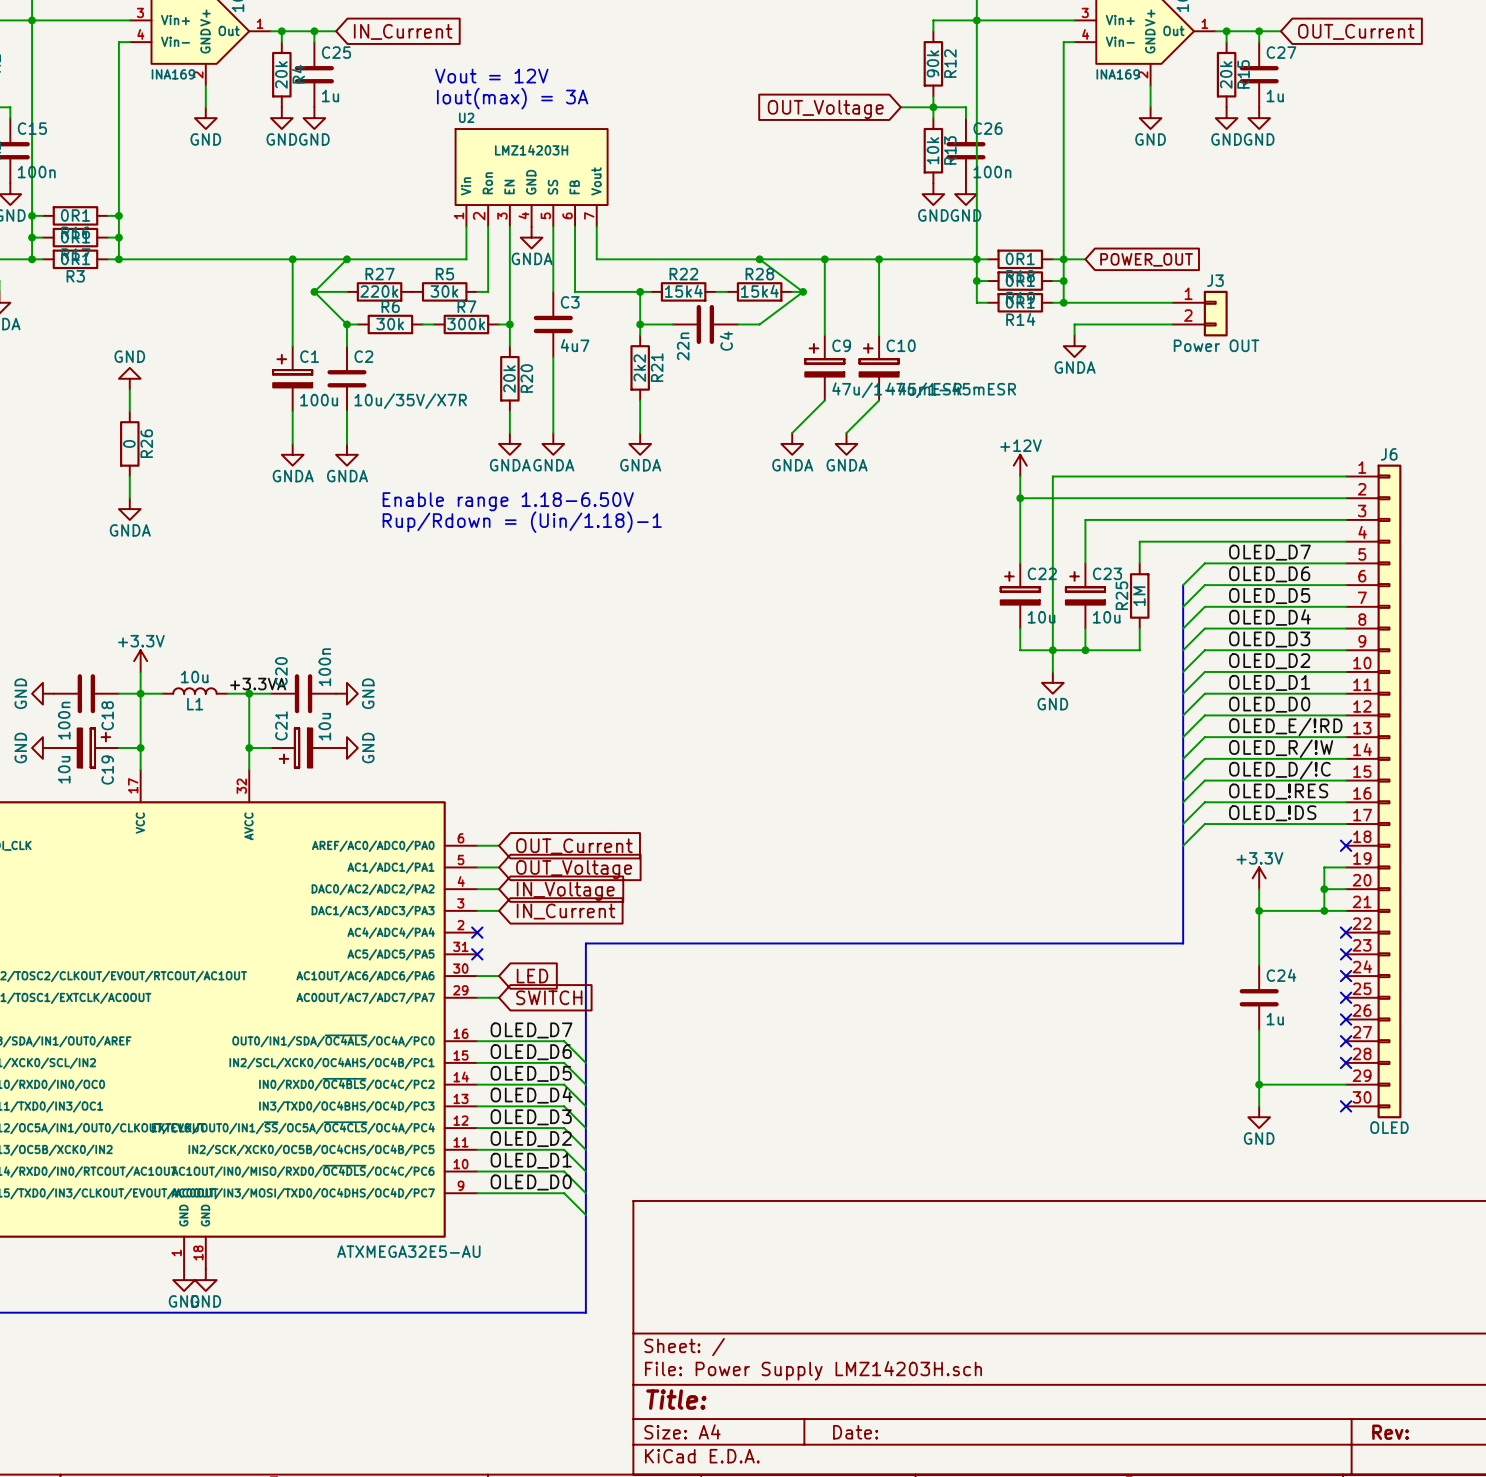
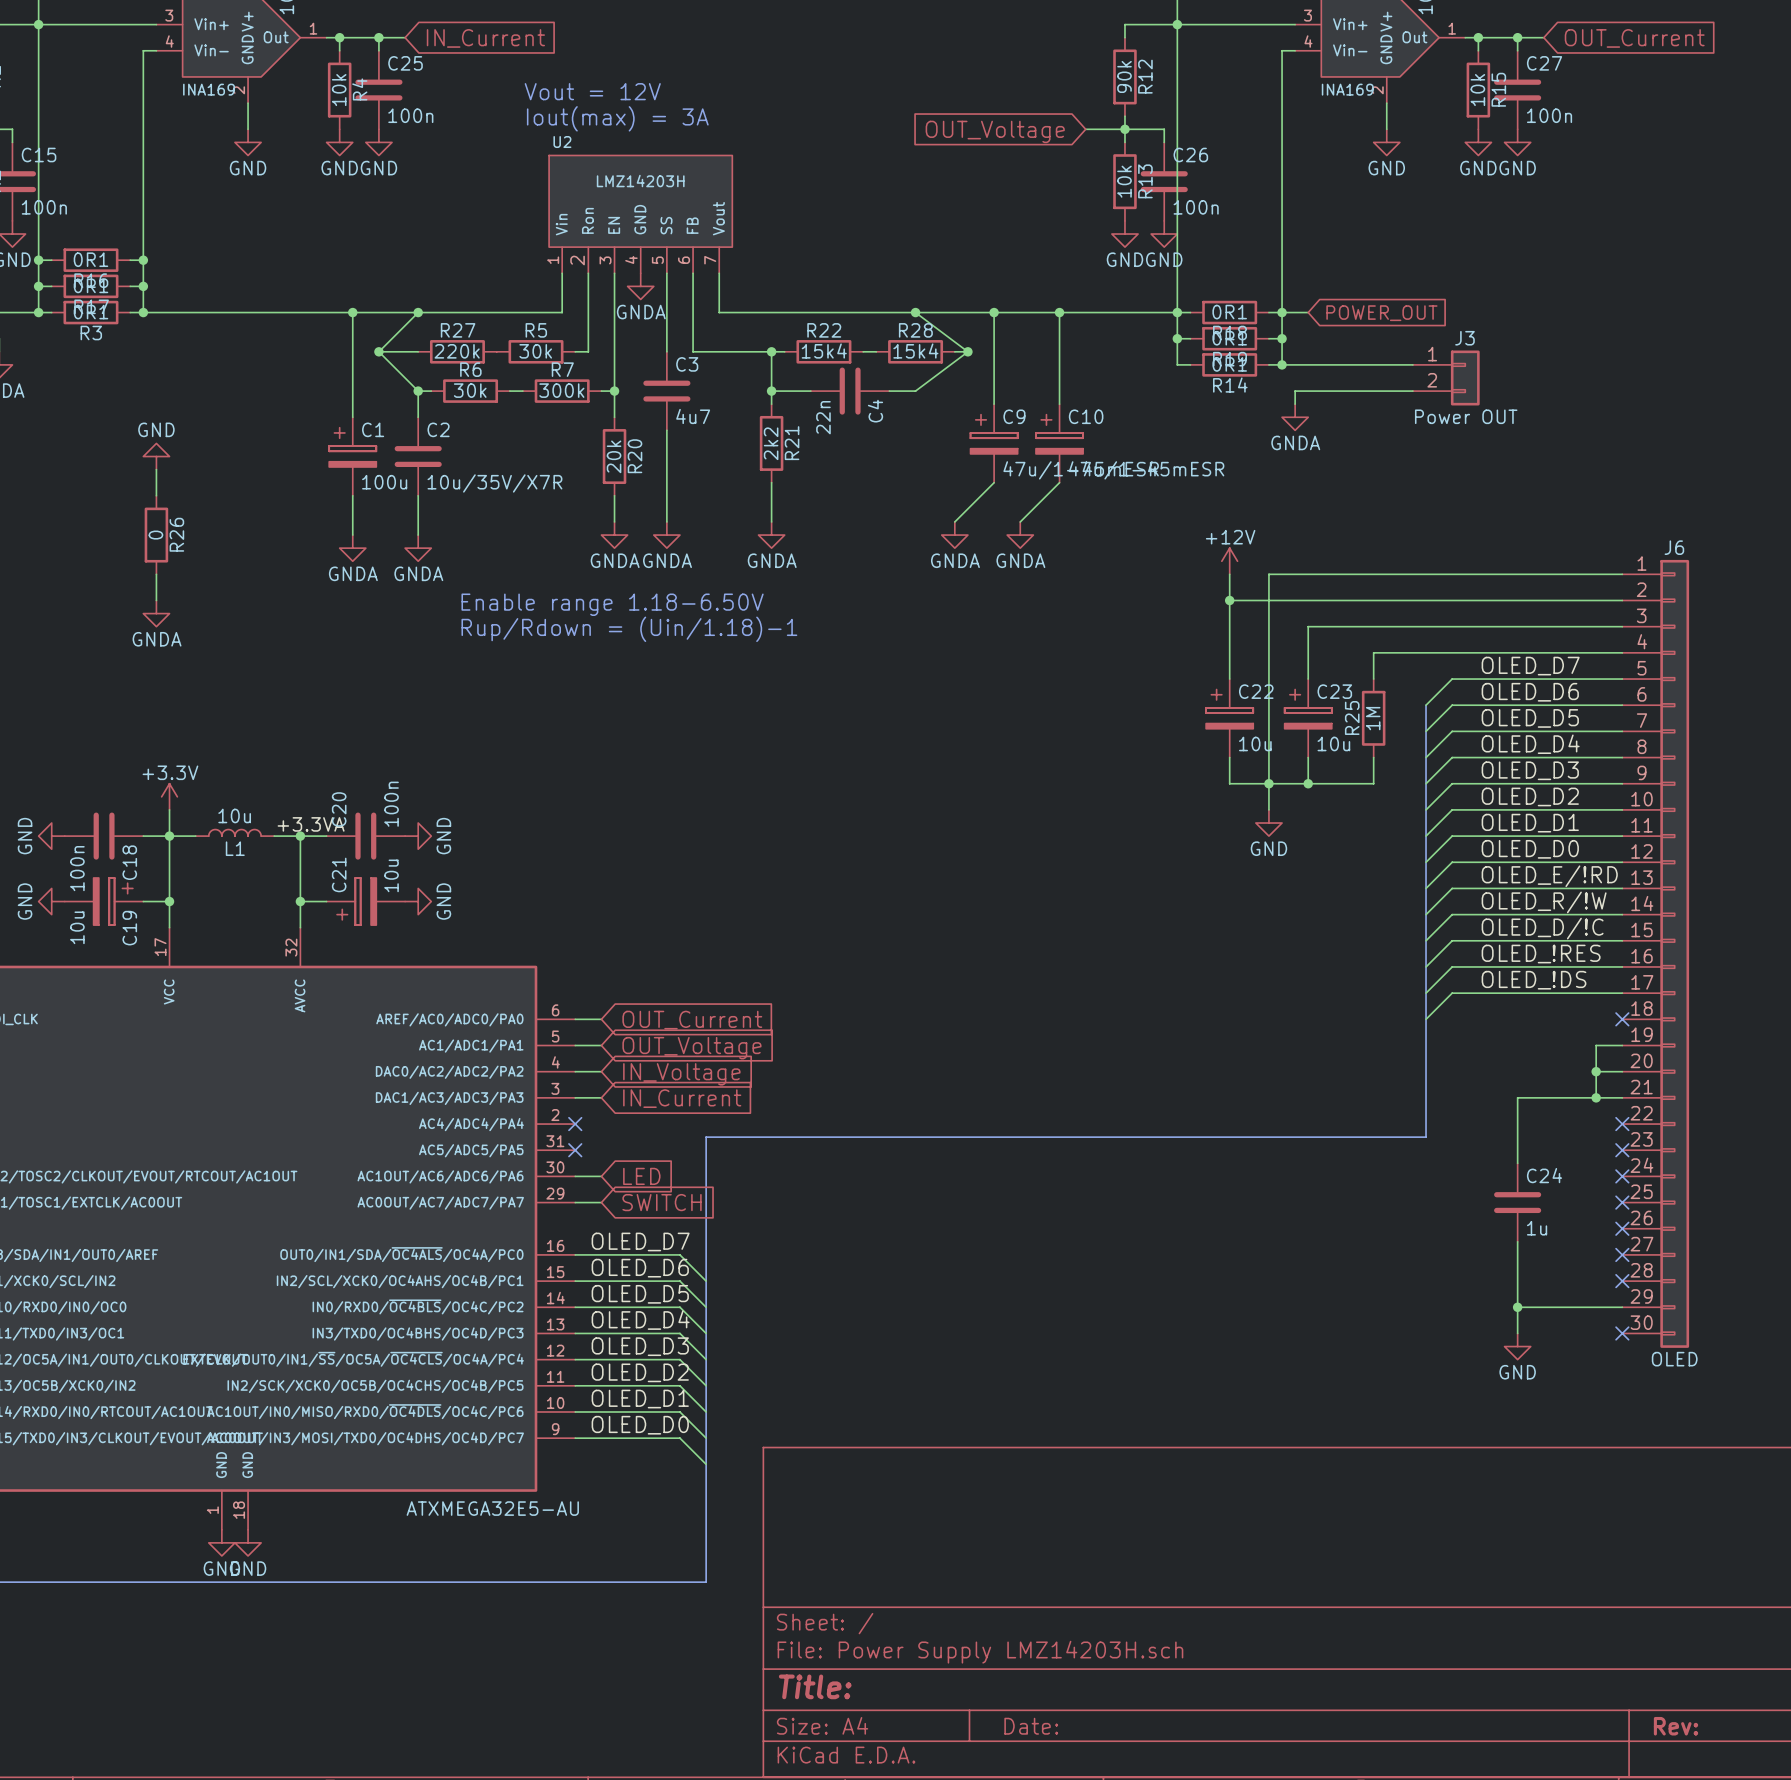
R4 value: 20k (281, 74) -> 10k (339, 90)
R15 value: 20k (1226, 74) -> 10k (1477, 90)
C25 value: 1u (330, 96) -> 100n (410, 115)
C27 value: 1u (1275, 96) -> 100n (1549, 115)
power symbol: +3.3V (1259, 878) -> none
wire: (1259, 889) (1259, 910) -> none
junction: (1259, 910) -> none

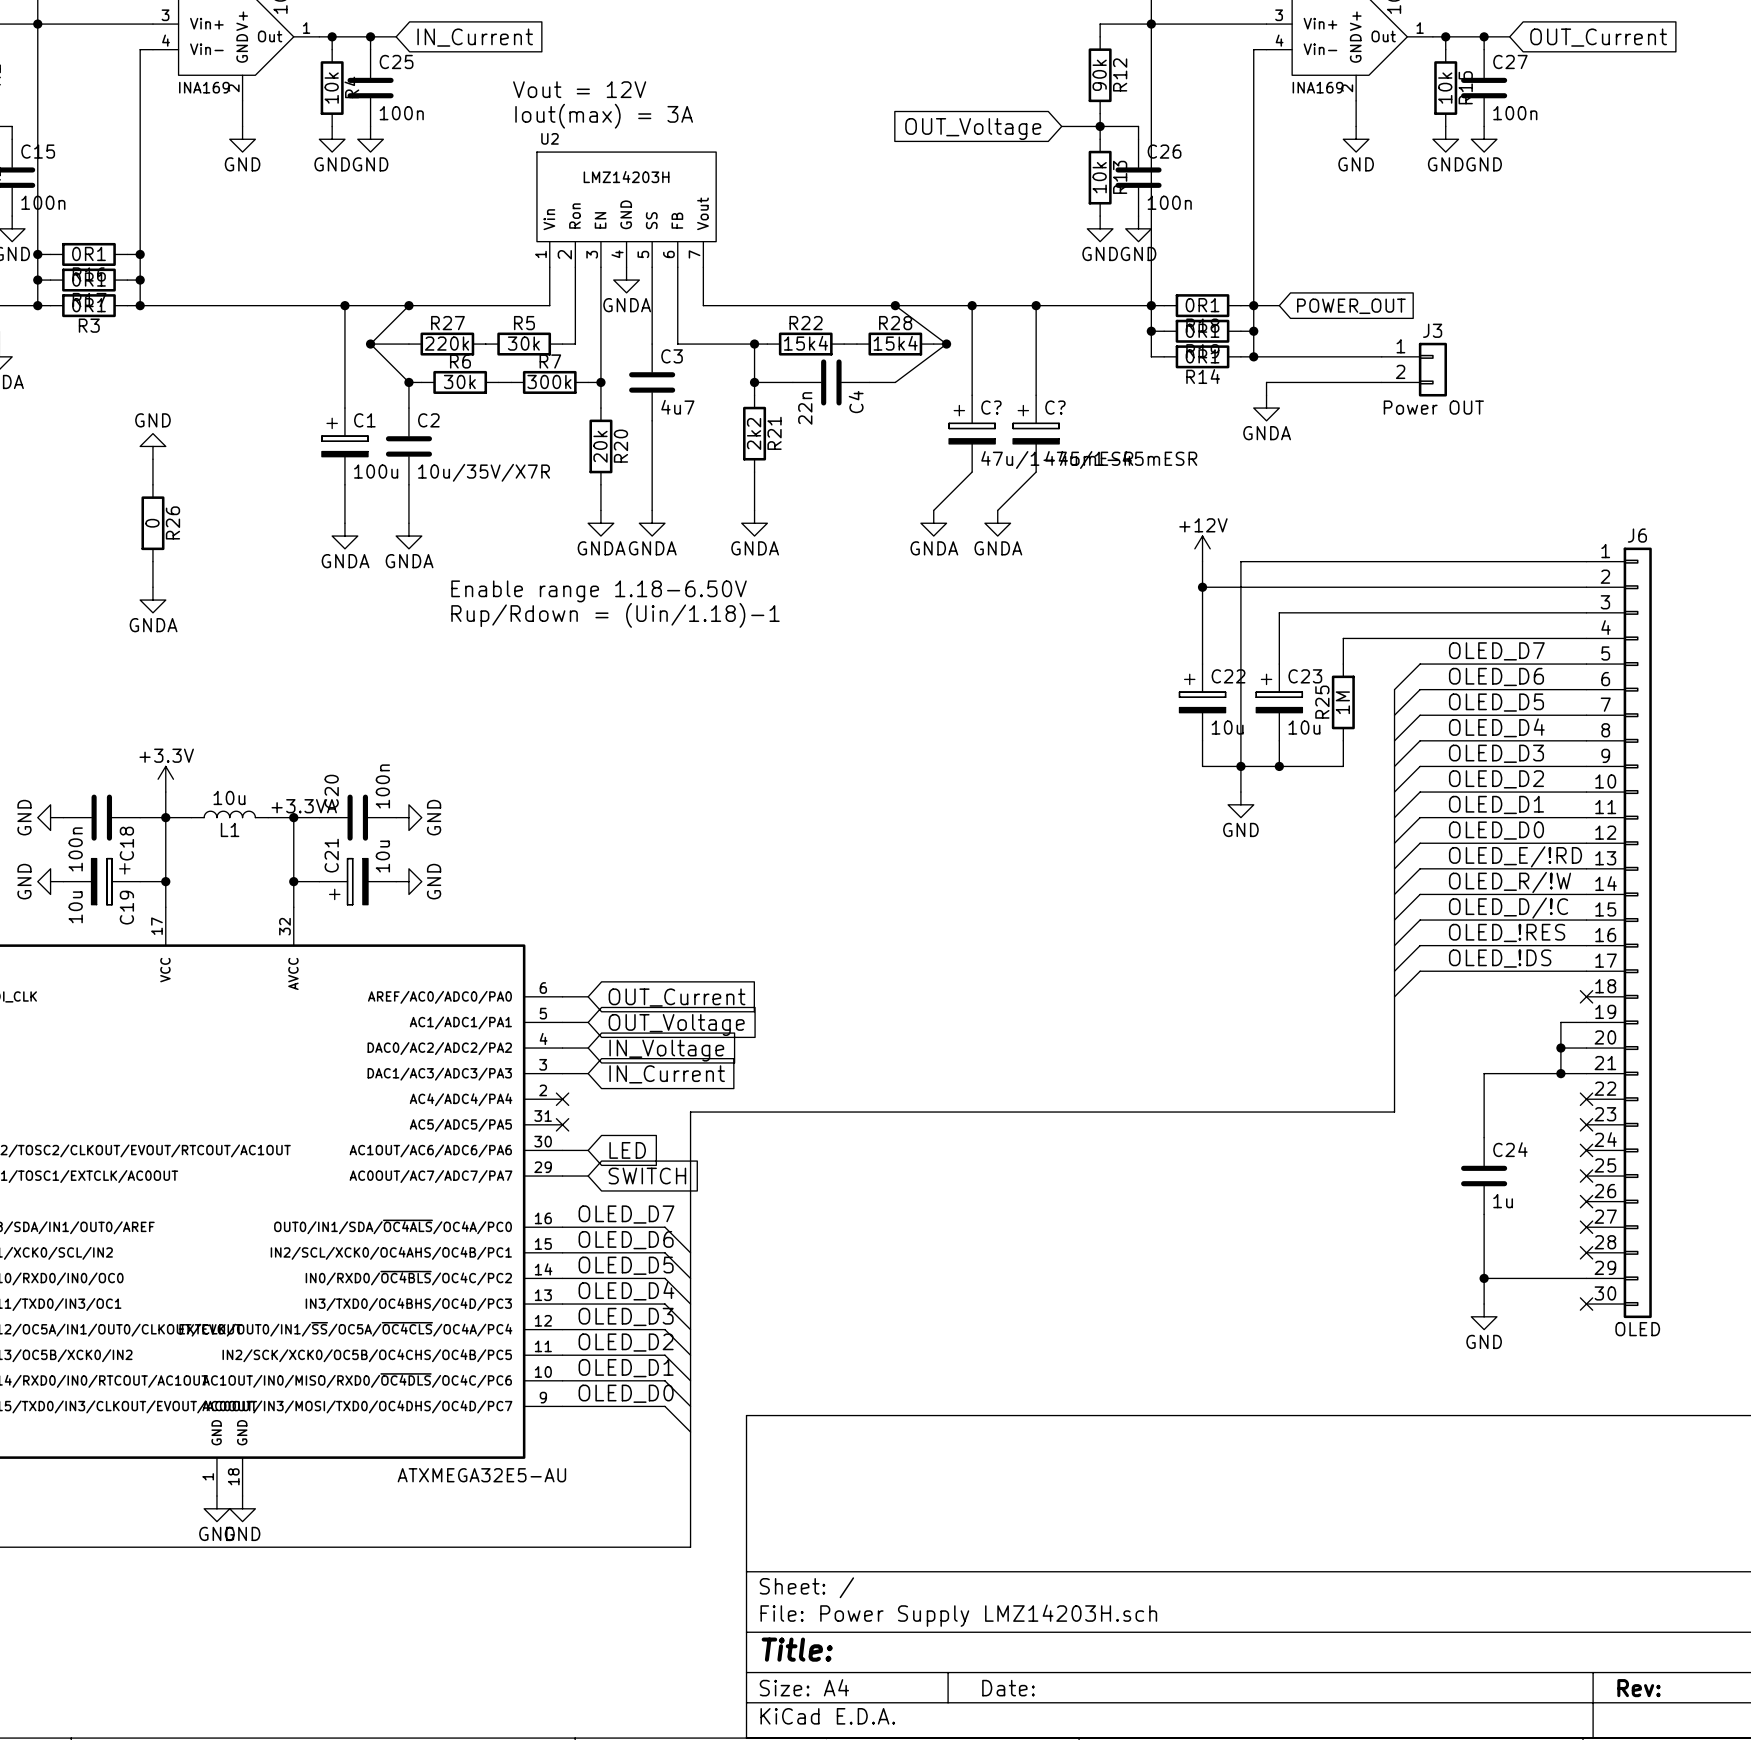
C9 name: C9 (1014, 416) -> C? (991, 407)
C10 name: C10 (1086, 416) -> C? (1055, 407)

